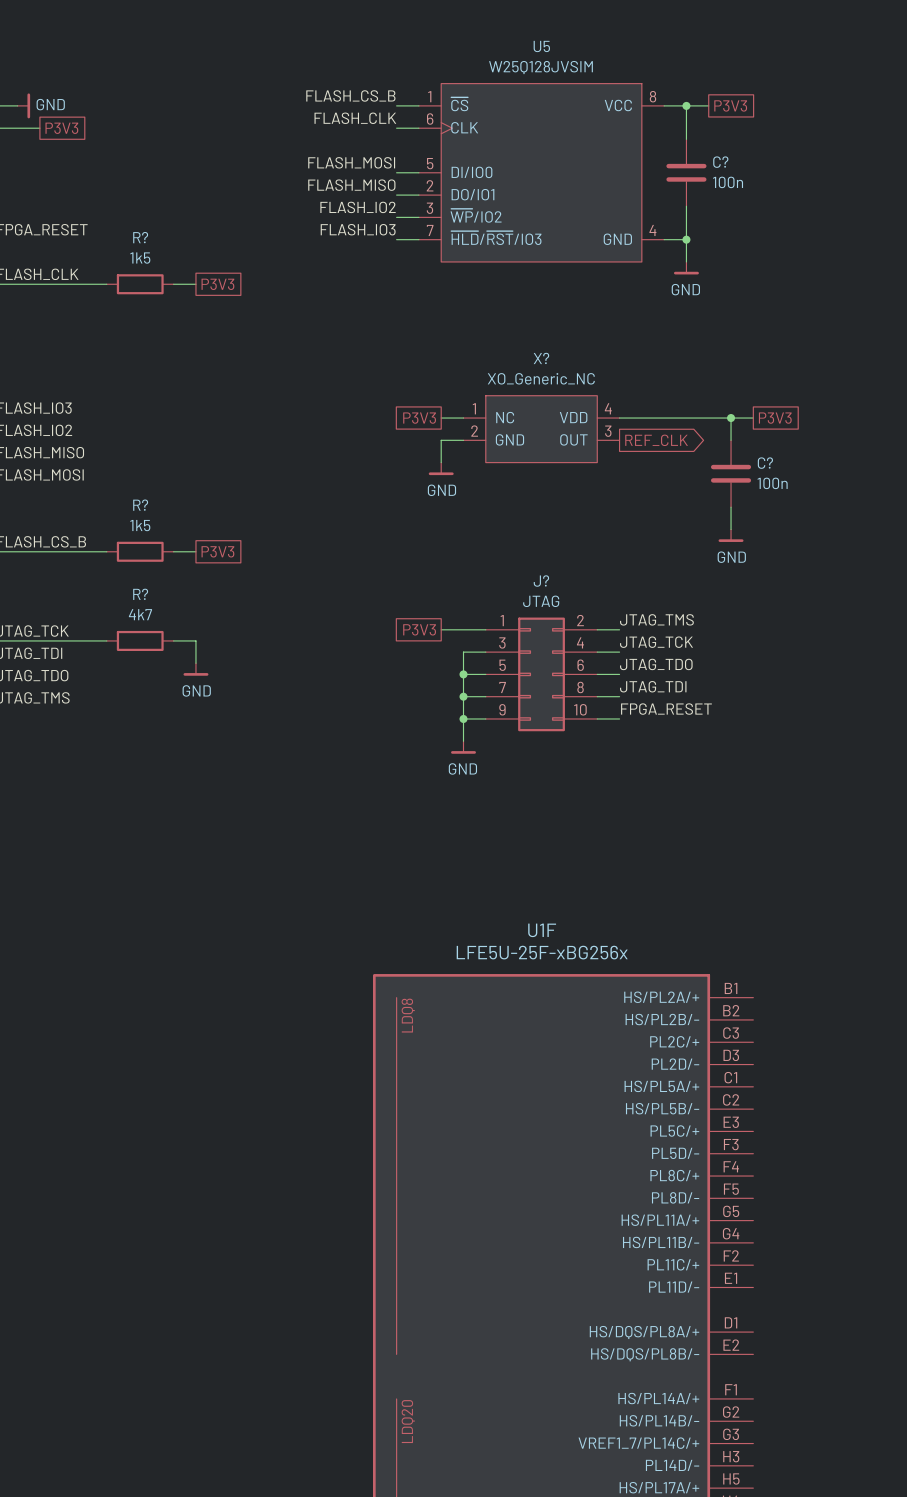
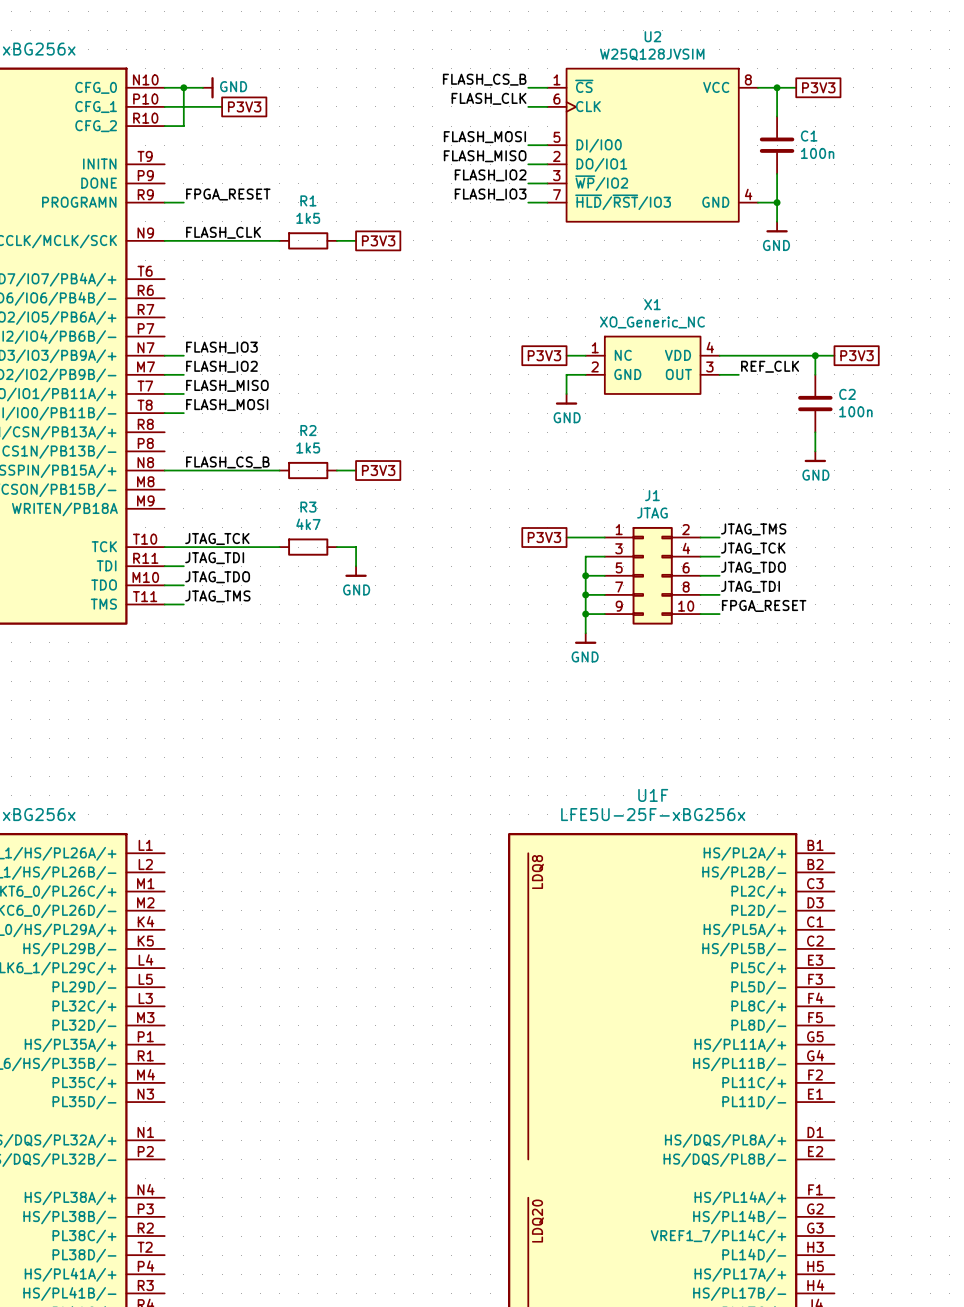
U5 name: U5 (541, 46) -> U2 (652, 36)
C? name: C? (720, 162) -> C1 (809, 136)
R? name: R? (140, 237) -> R1 (308, 200)
X? name: X? (541, 358) -> X1 (652, 304)
label: none -> REF_CLK (770, 366)
global label: REF_CLK (656, 440) -> none
C? name: C? (765, 463) -> C2 (847, 394)
R? name: R? (140, 505) -> R2 (308, 430)
J? name: J? (541, 581) -> J1 (652, 495)
R? name: R? (140, 594) -> R3 (308, 507)

